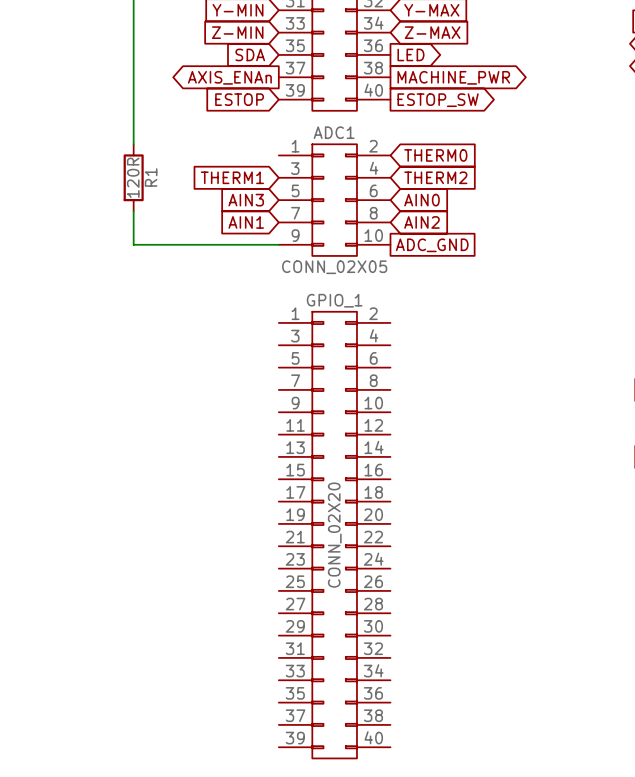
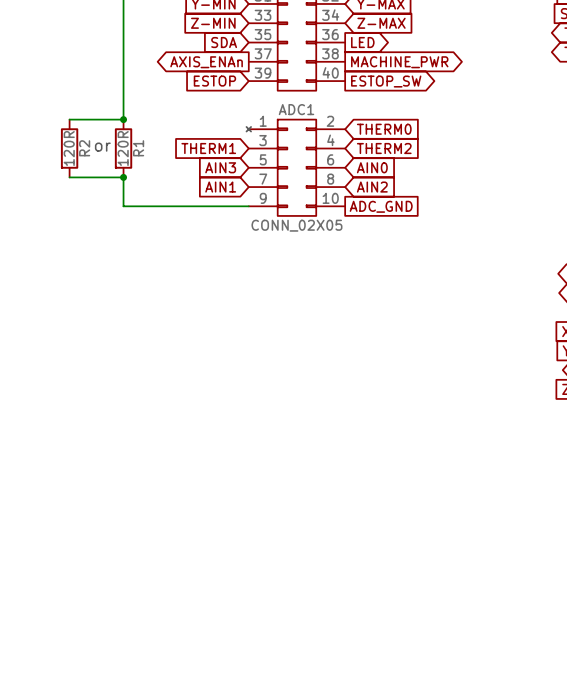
wire: none -> (69, 119) (123, 119)
junction: none -> (123, 119)
ADC1 symbol: [278, 144, 391, 256] -> [246, 119, 346, 216]
text: none -> or (102, 147)
R2: none -> 120R (69, 148)
wire: none -> (69, 177) (123, 177)
junction: none -> (123, 177)
GPIO_1: CONN_02X20 (334, 535) -> none

